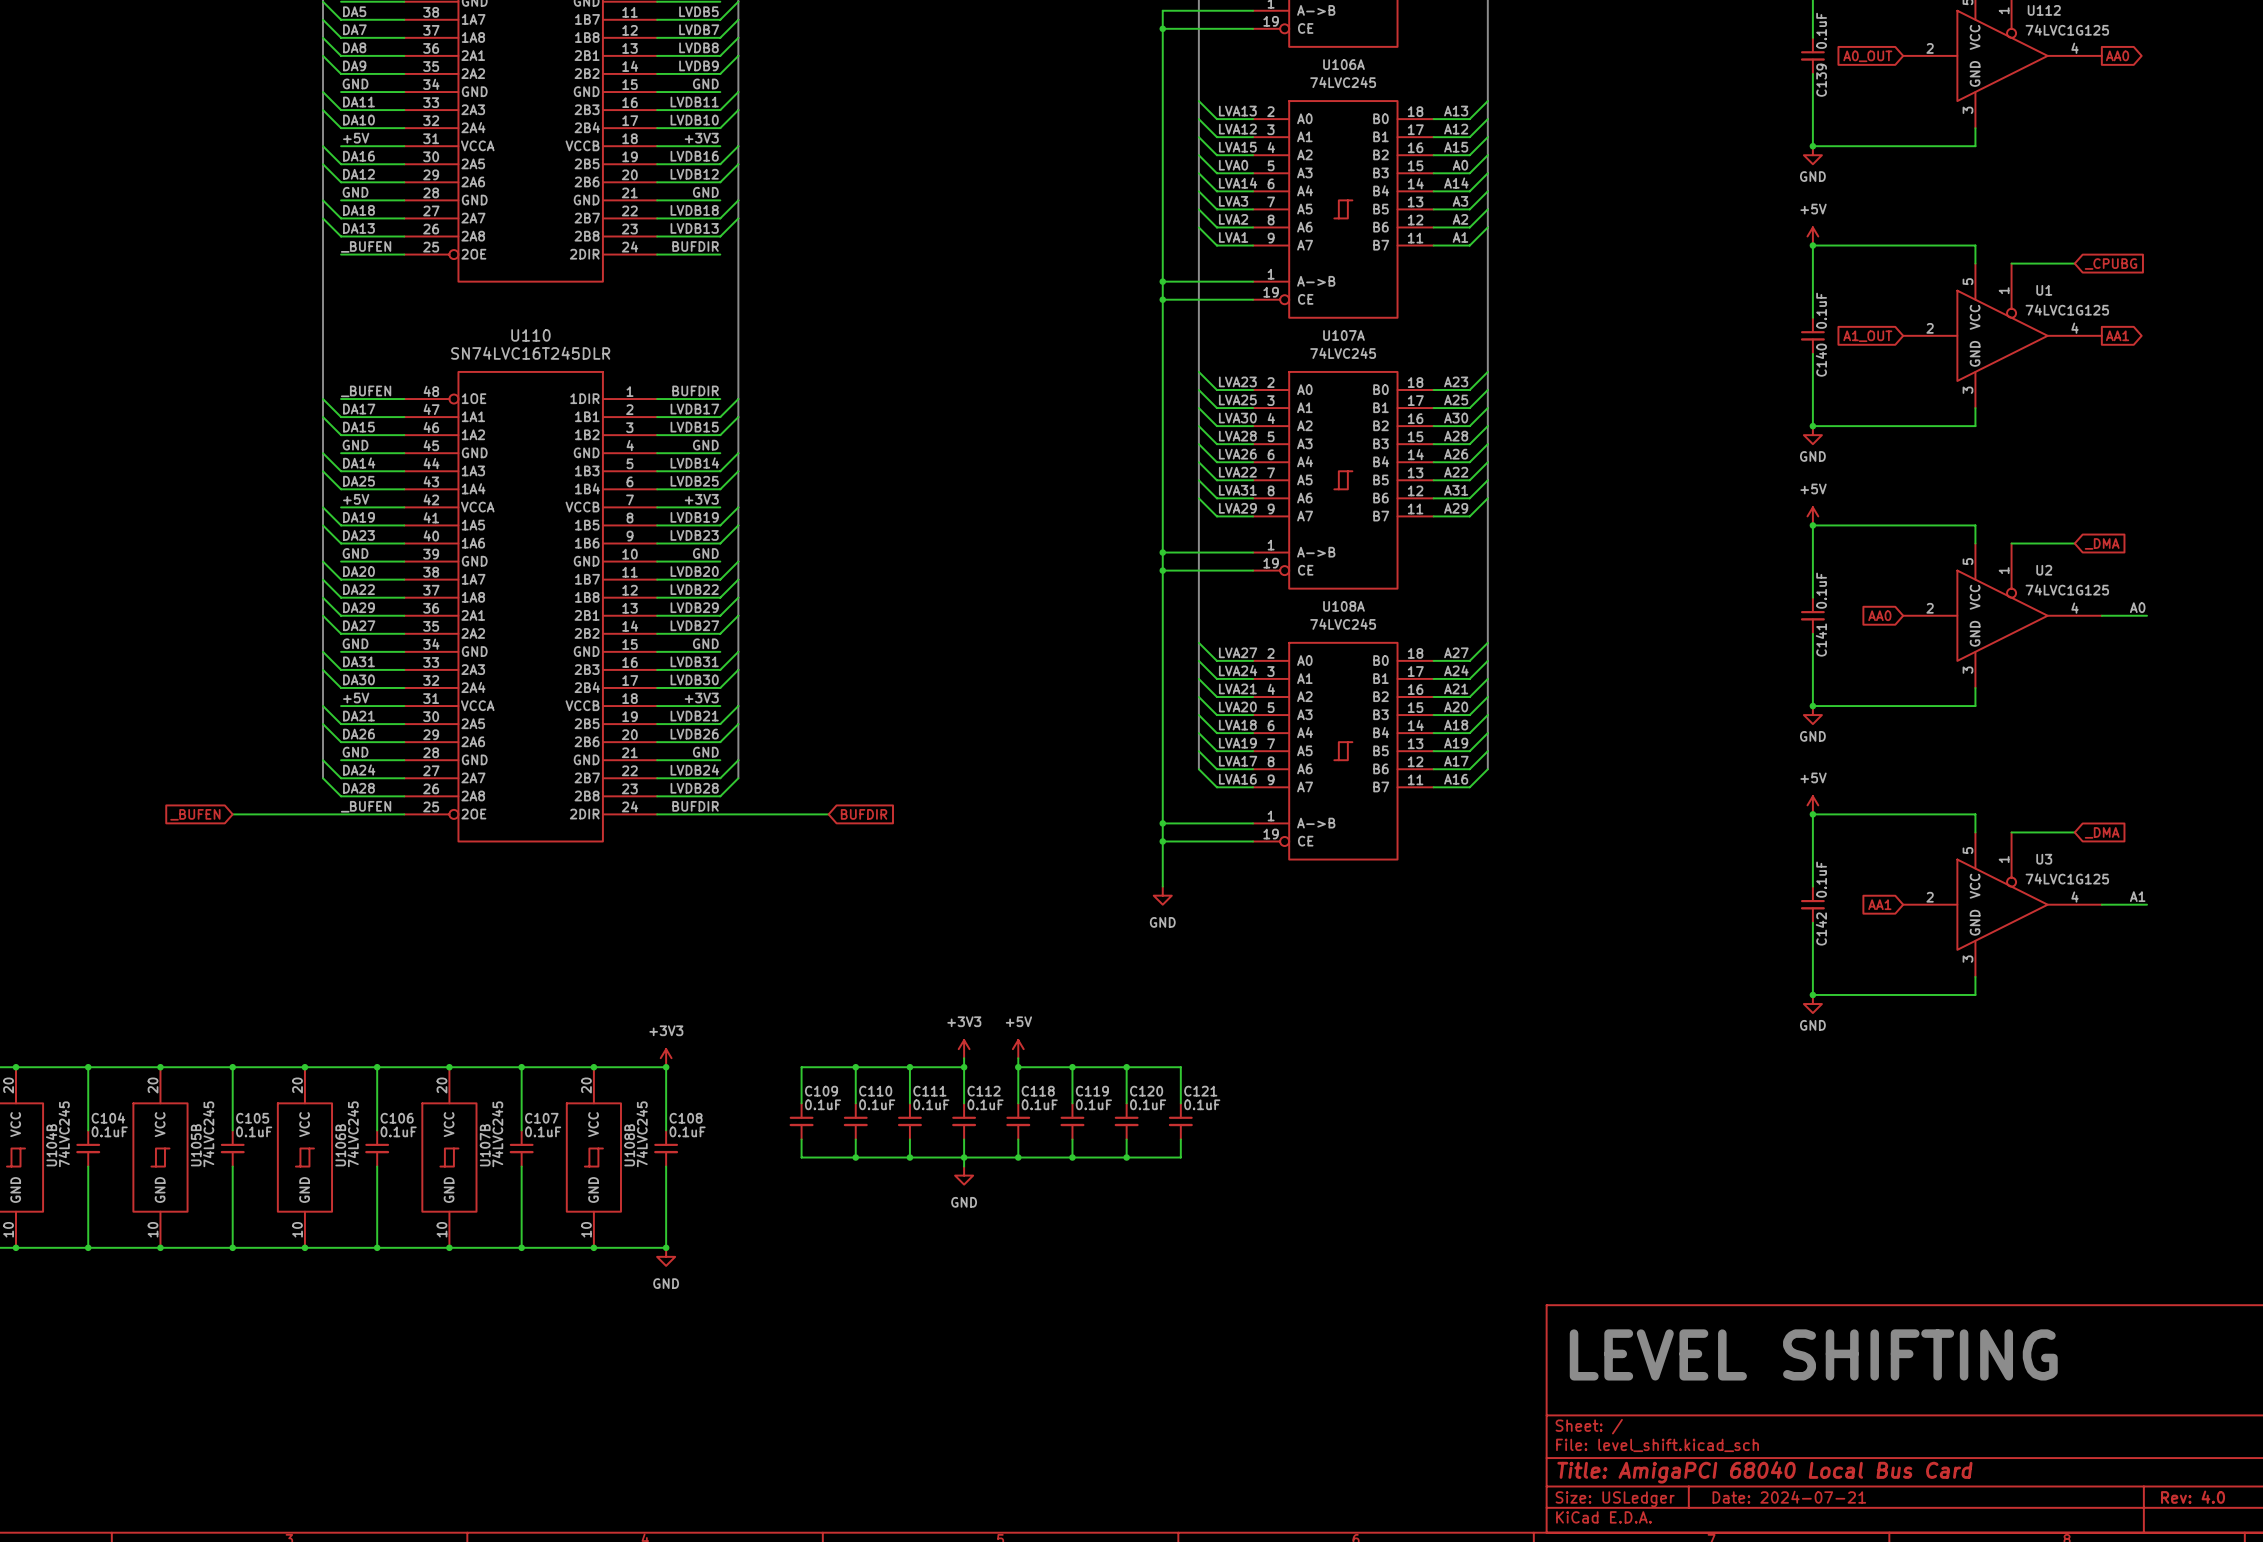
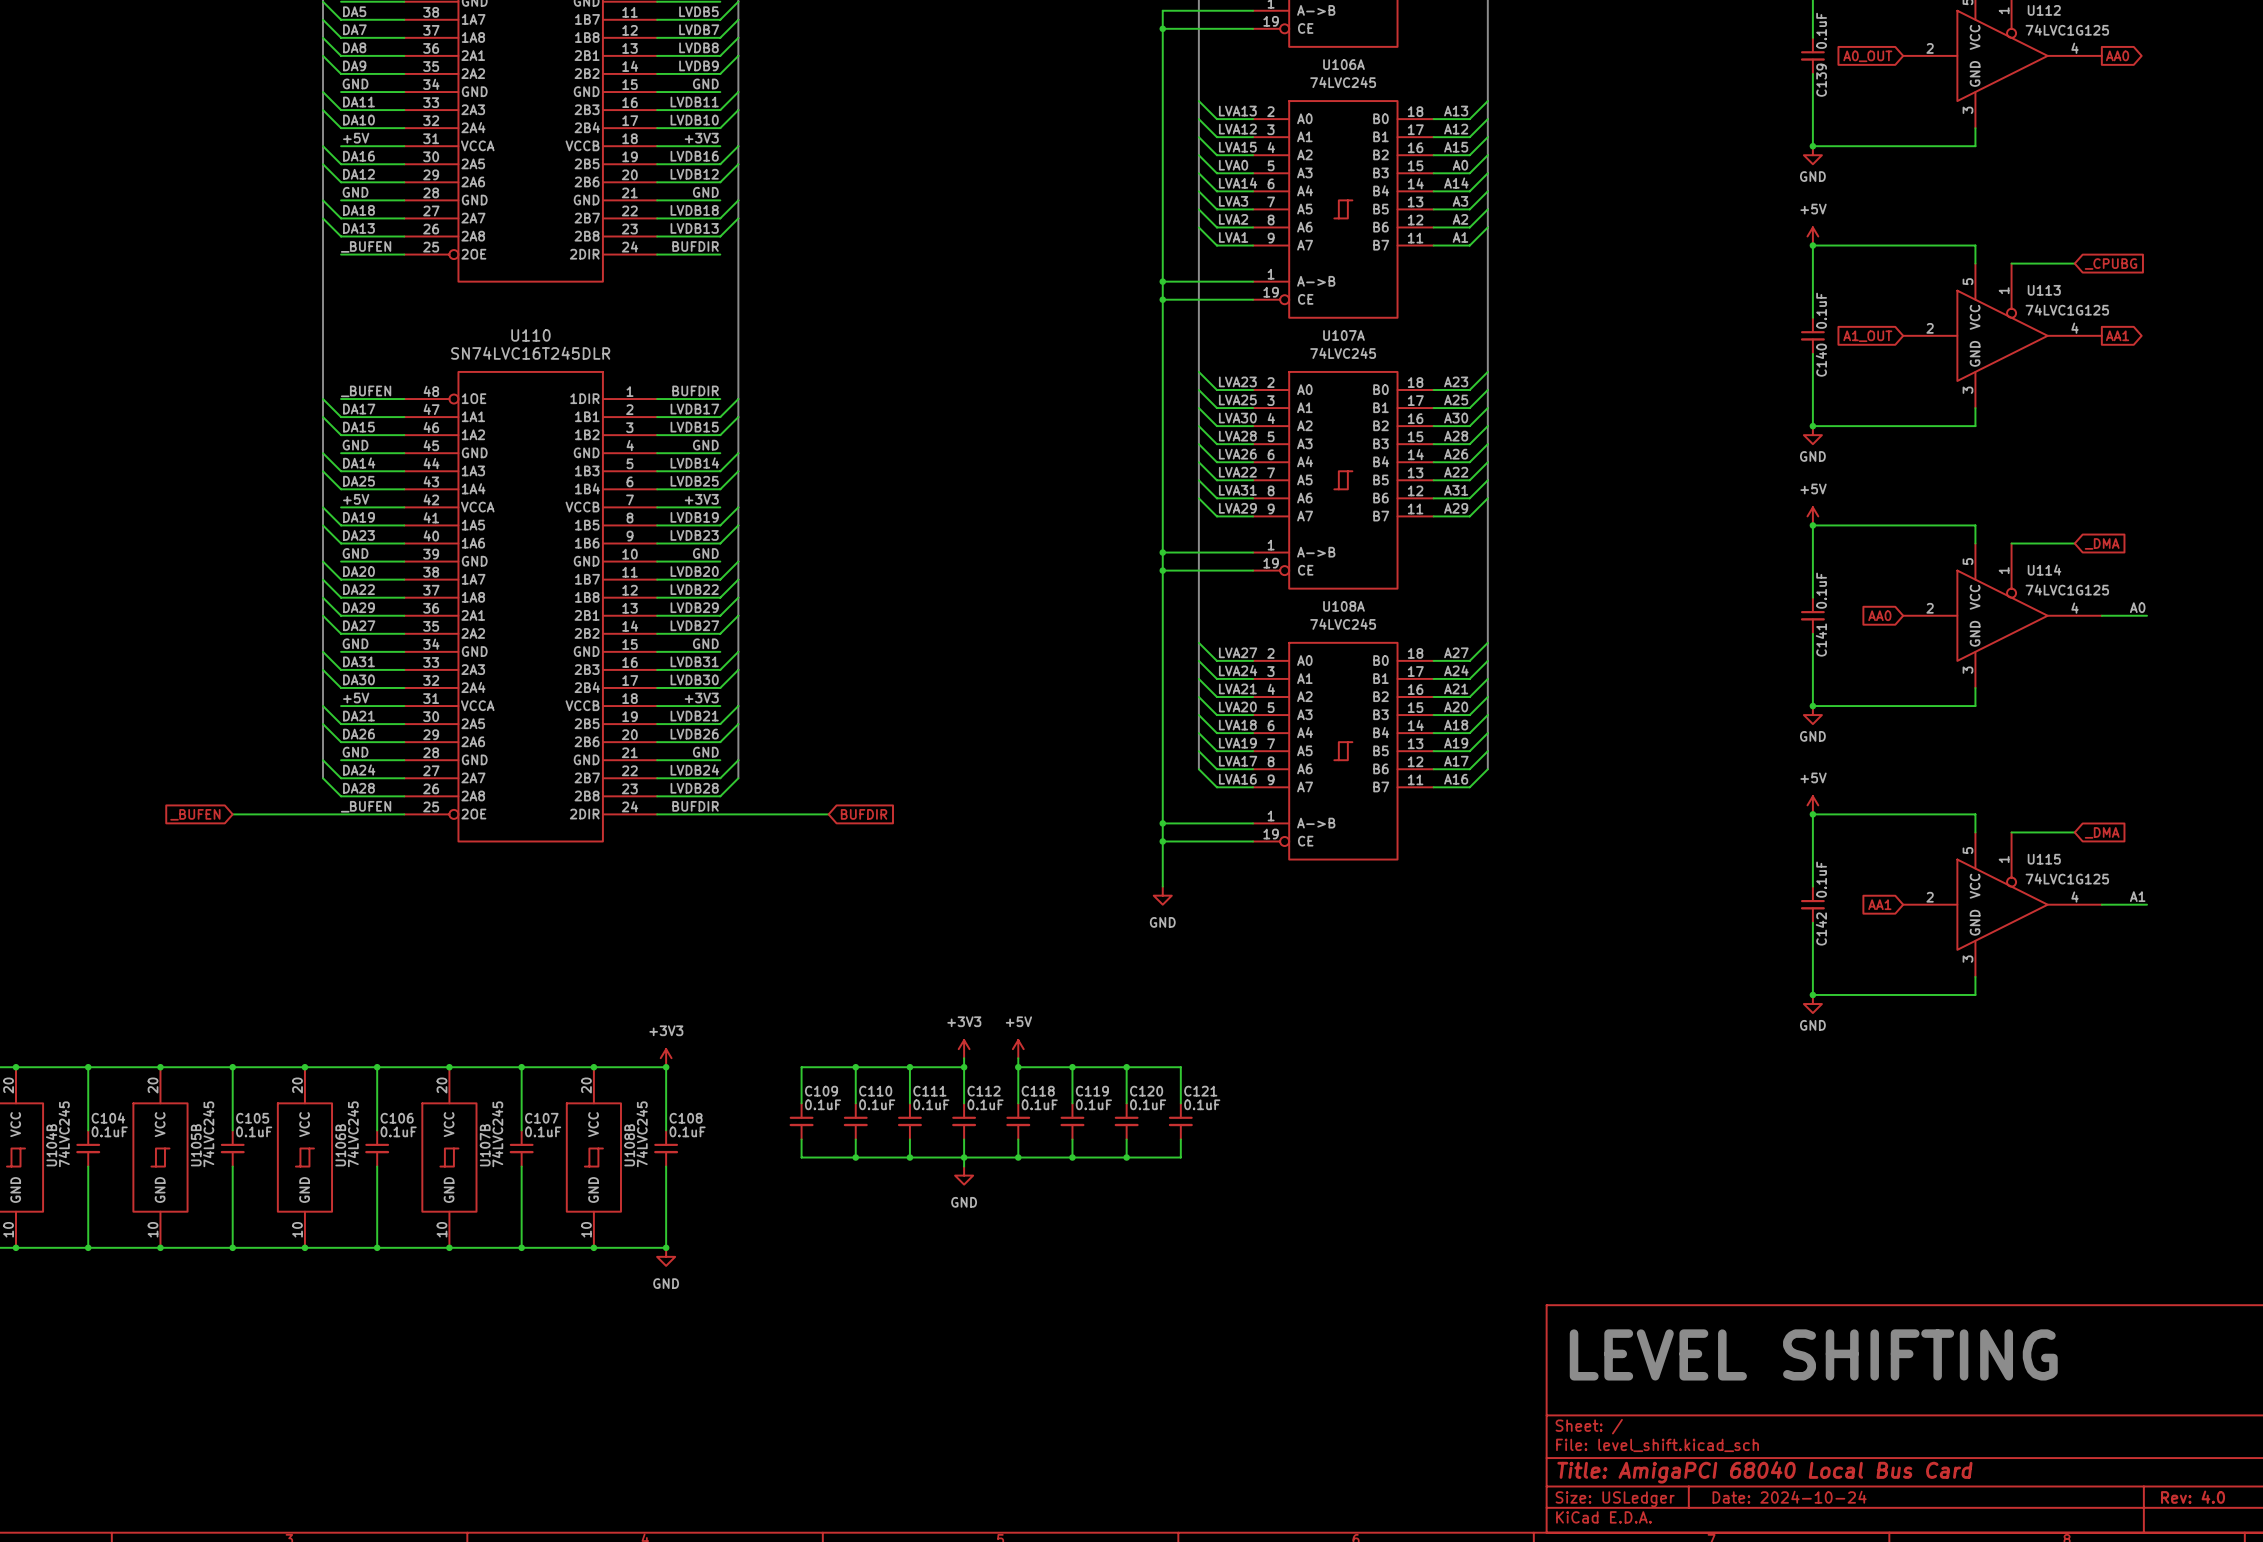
U1 name: U1 (2044, 290) -> U113 (2044, 290)
U2 name: U2 (2044, 570) -> U114 (2044, 570)
U3 name: U3 (2044, 859) -> U115 (2044, 859)
title block: Date: 2024-07-21 (1789, 1497) -> Date: 2024-10-24 (1789, 1497)

